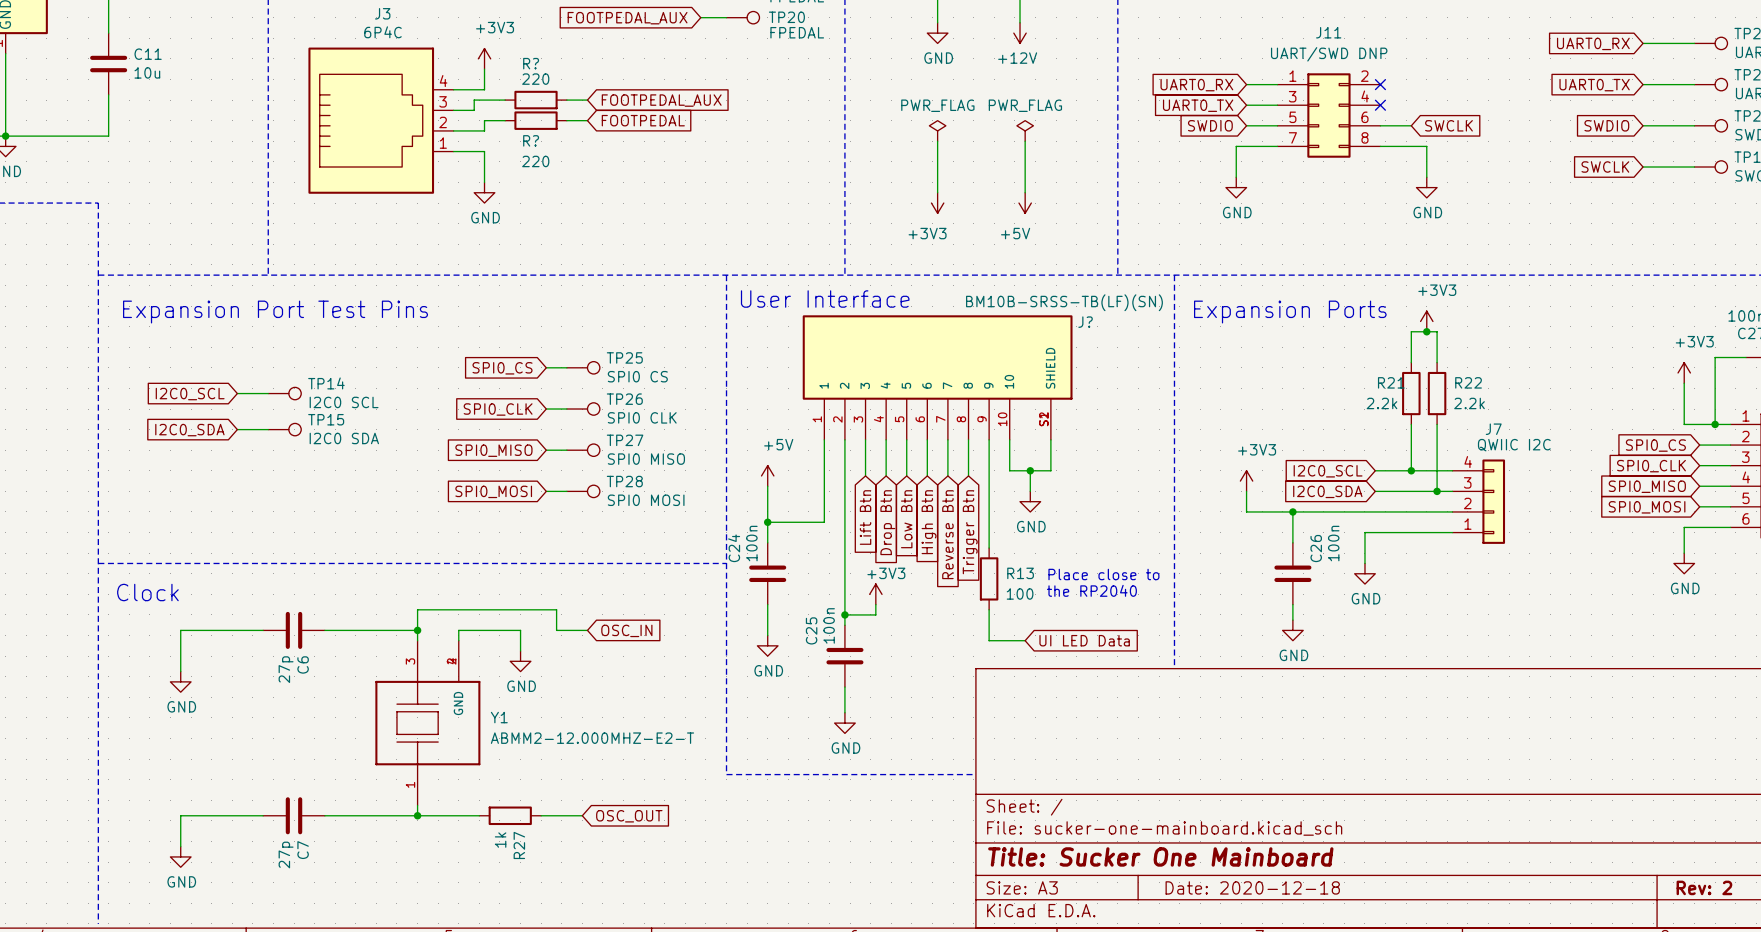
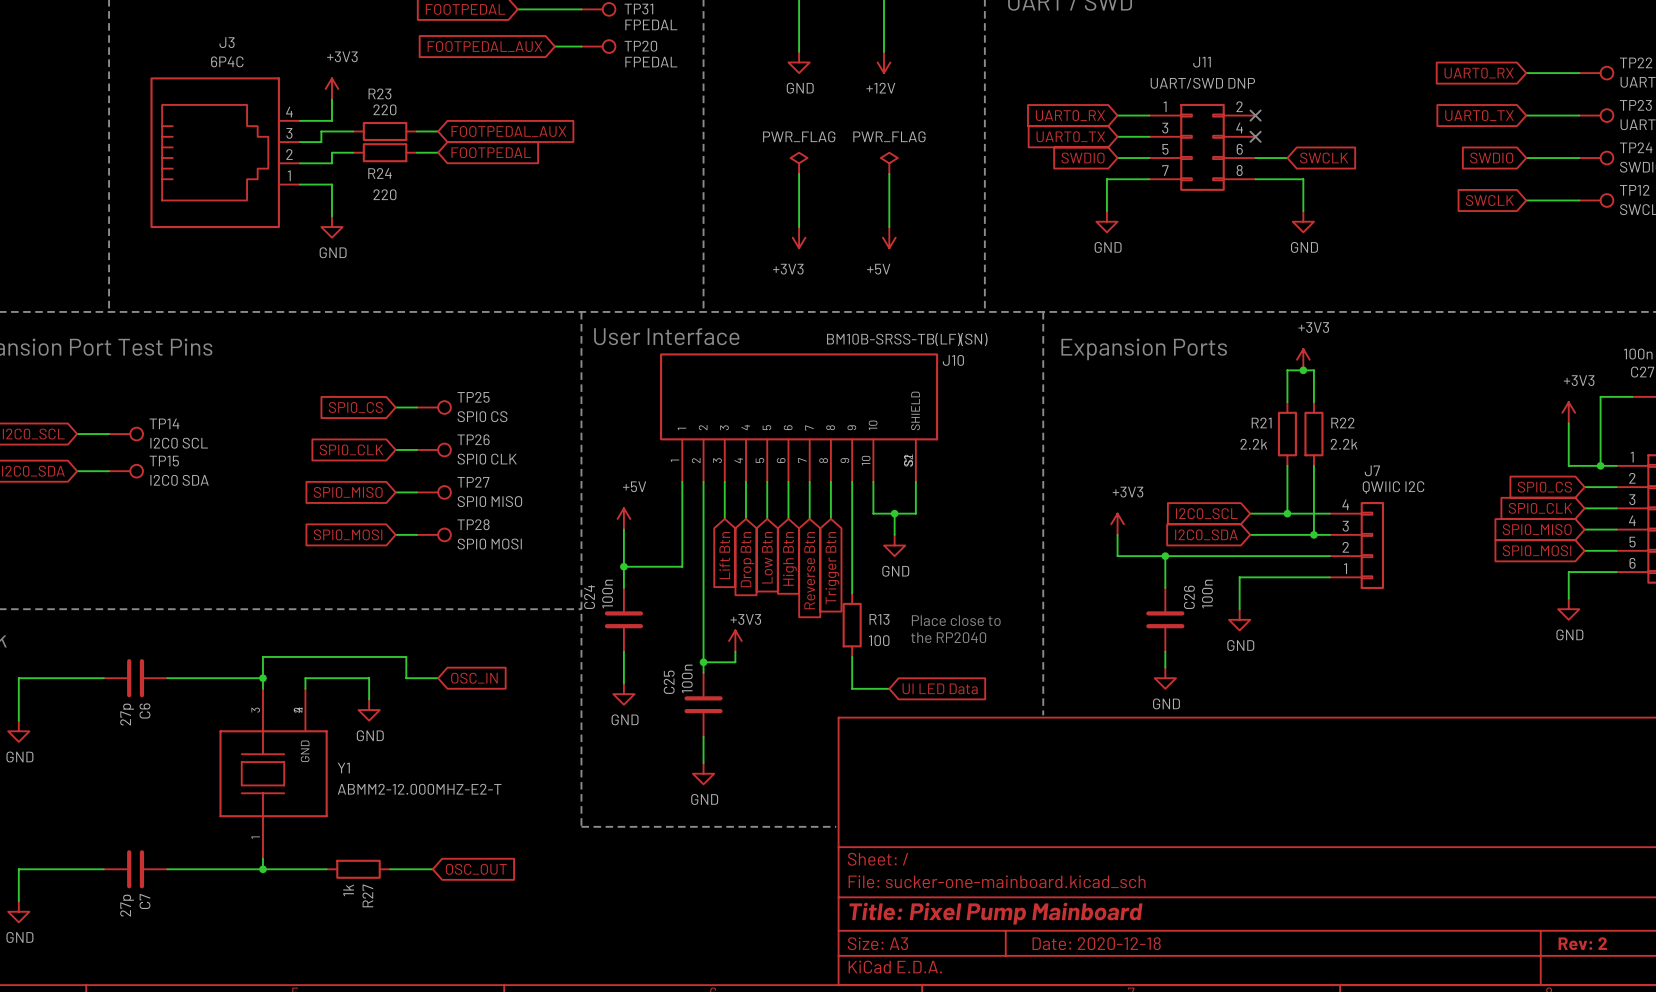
R? name: R? (531, 63) -> R23 (379, 93)
R? name: R? (531, 140) -> R24 (380, 173)
J? name: J? (1085, 322) -> J10 (953, 360)
title block: Title: Sucker One Mainboard (1160, 856) -> Title: Pixel Pump Mainboard (995, 913)

